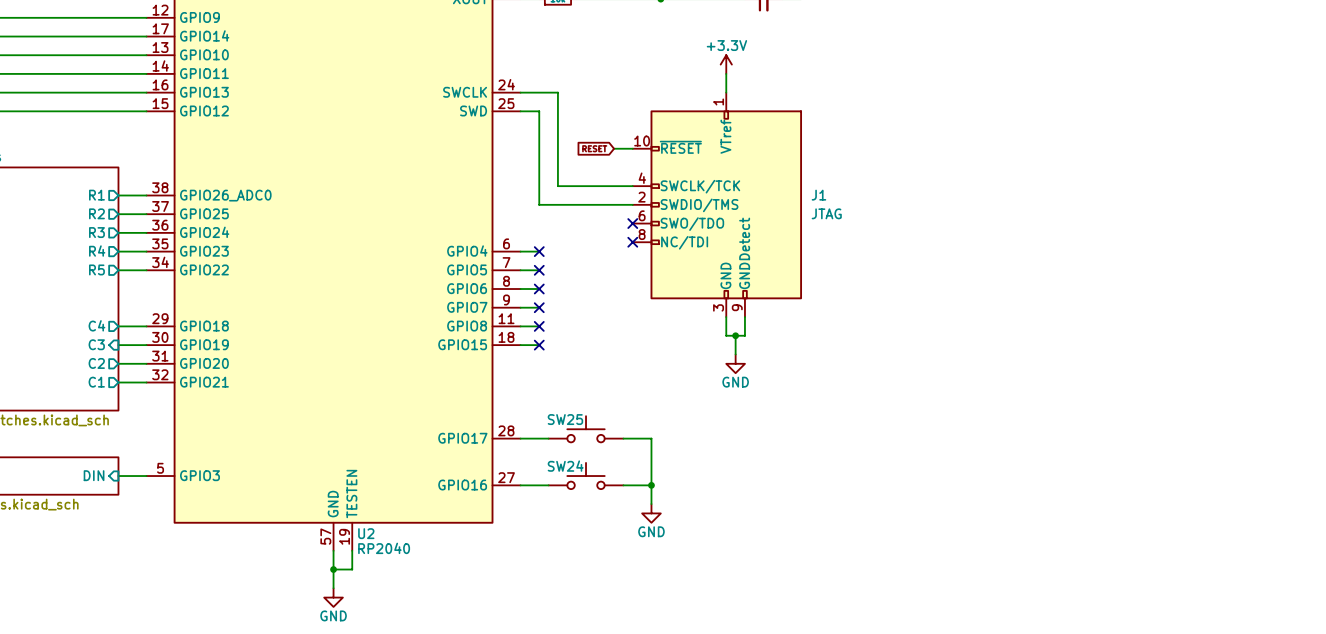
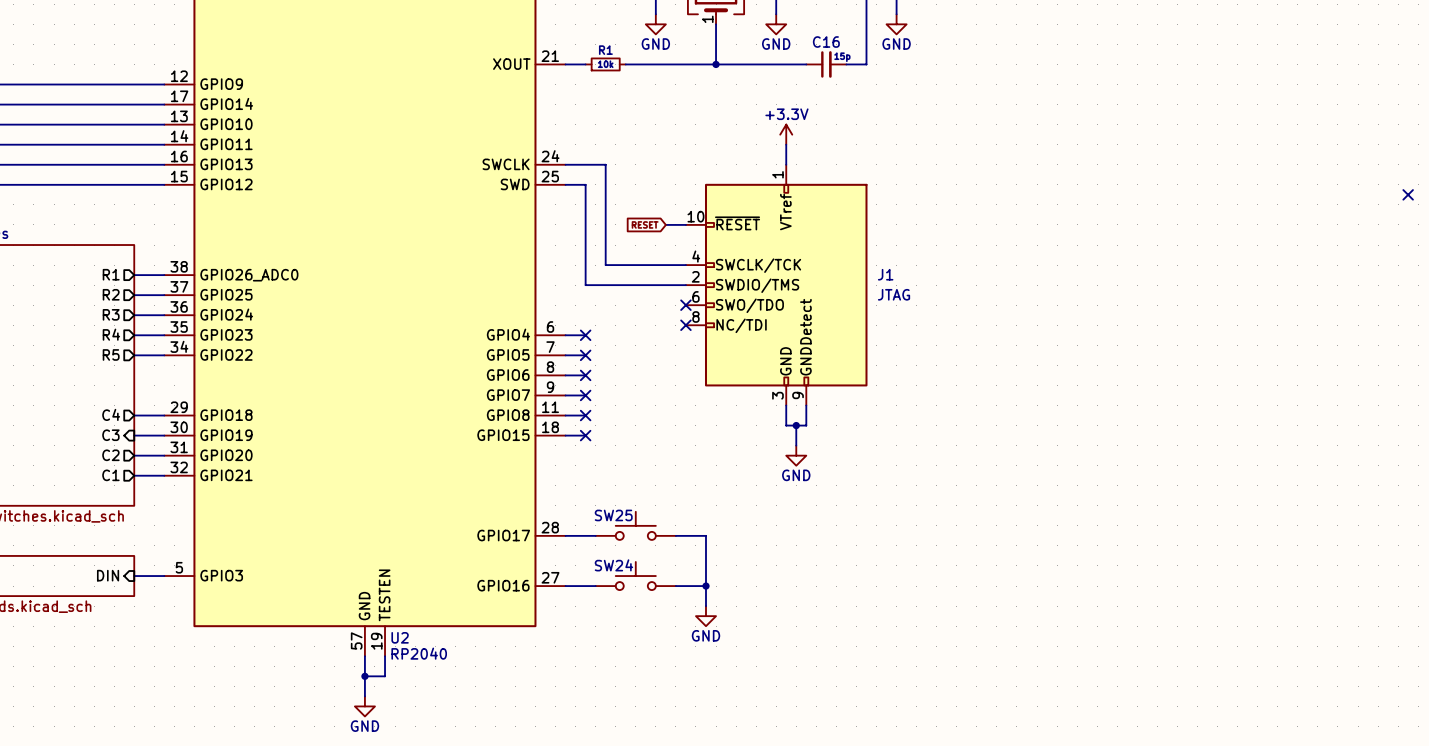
no-connect mark: none -> (1408, 194)

